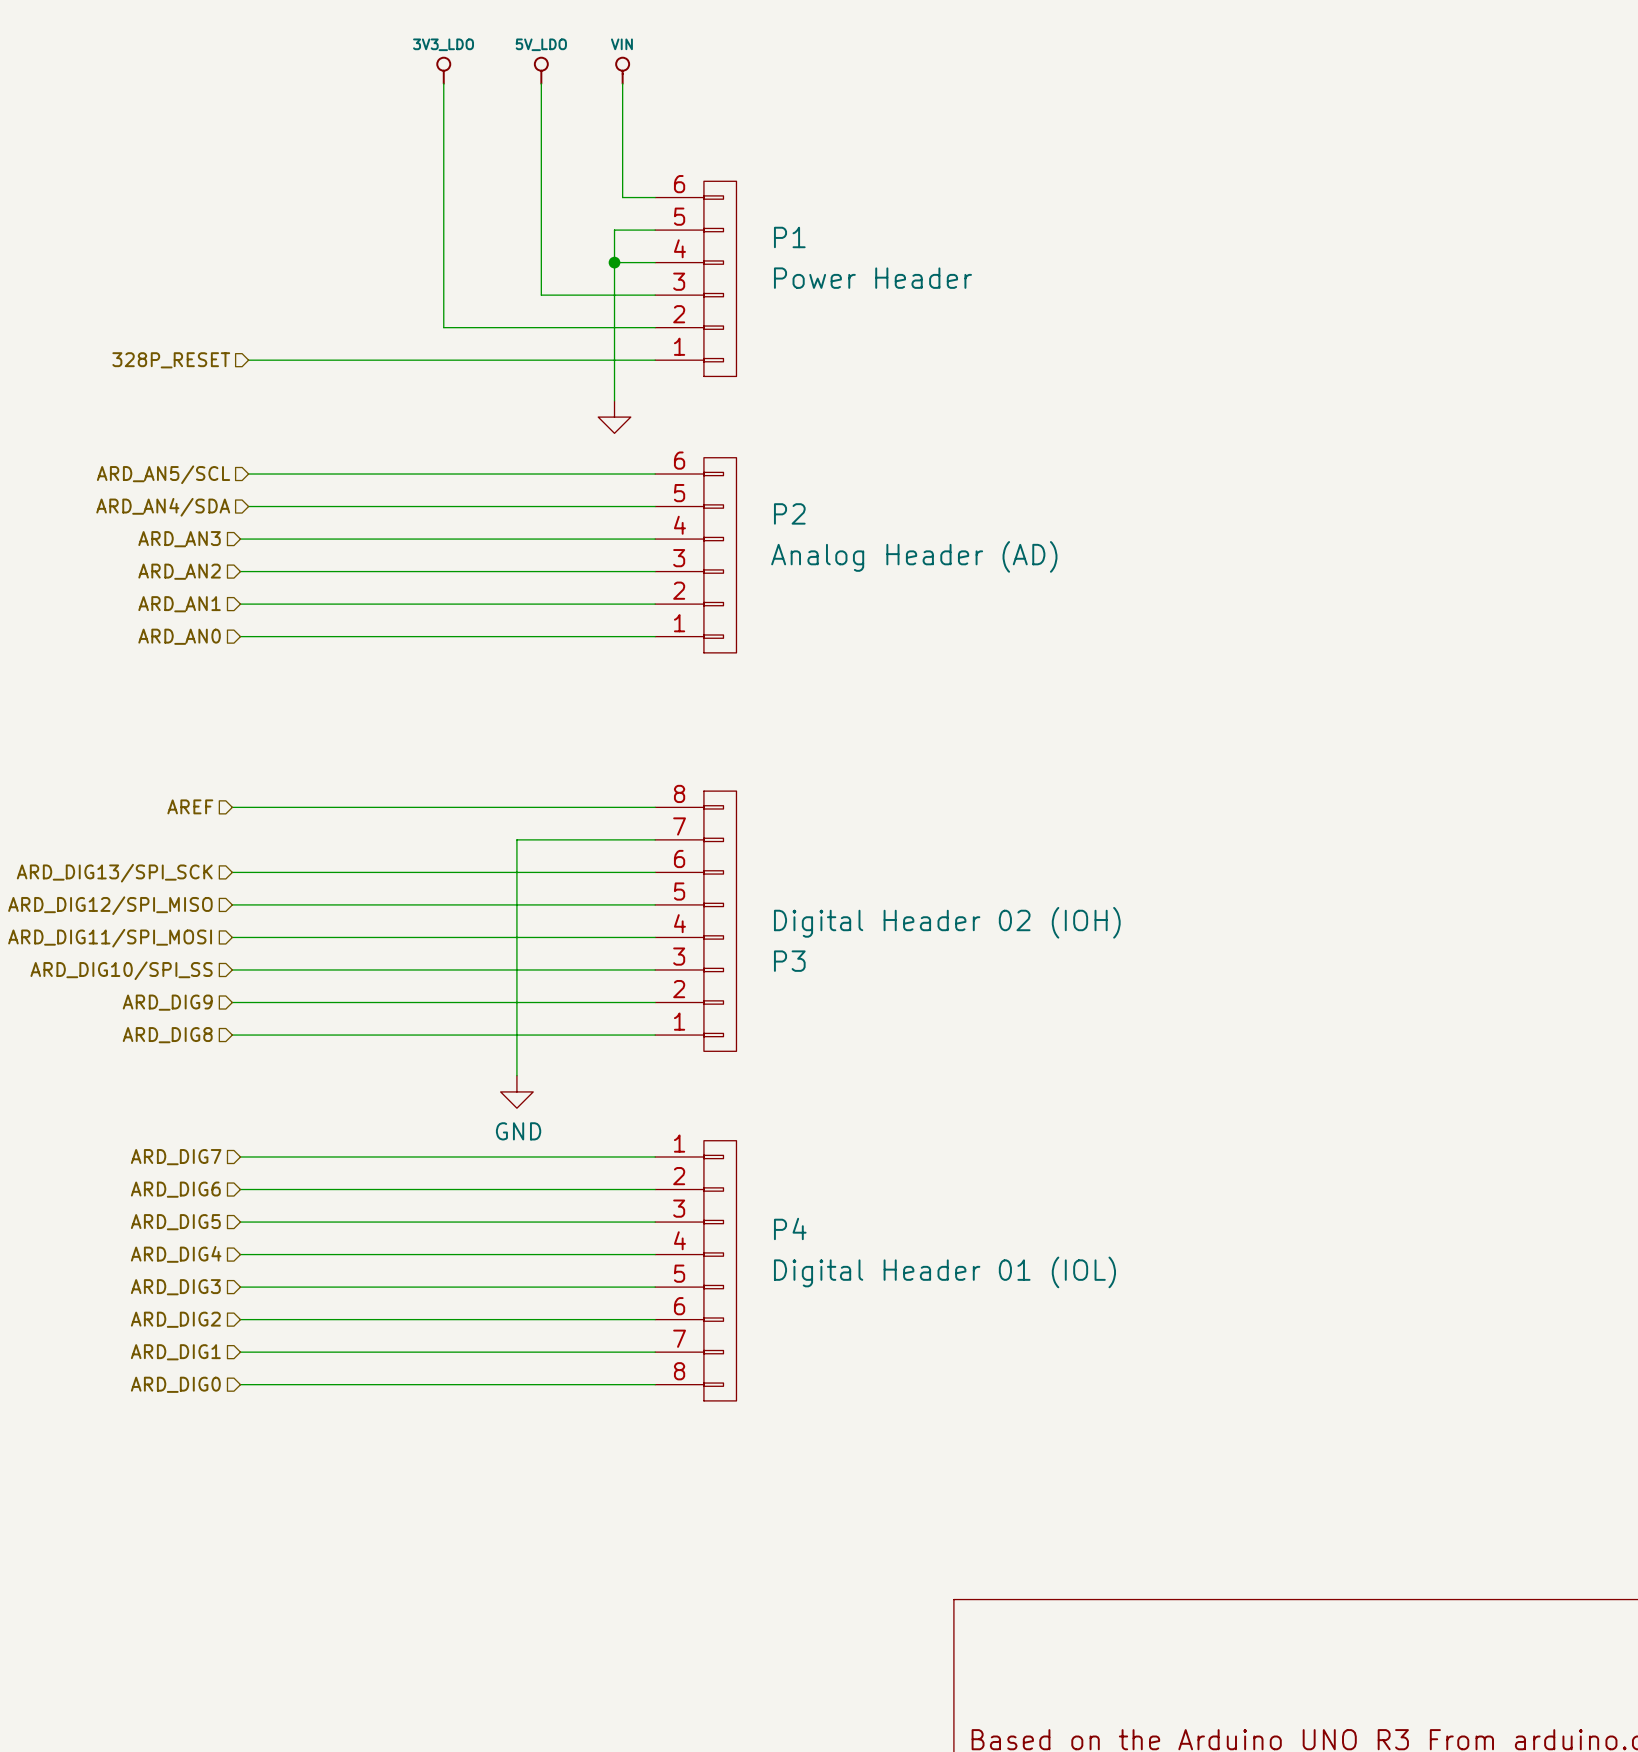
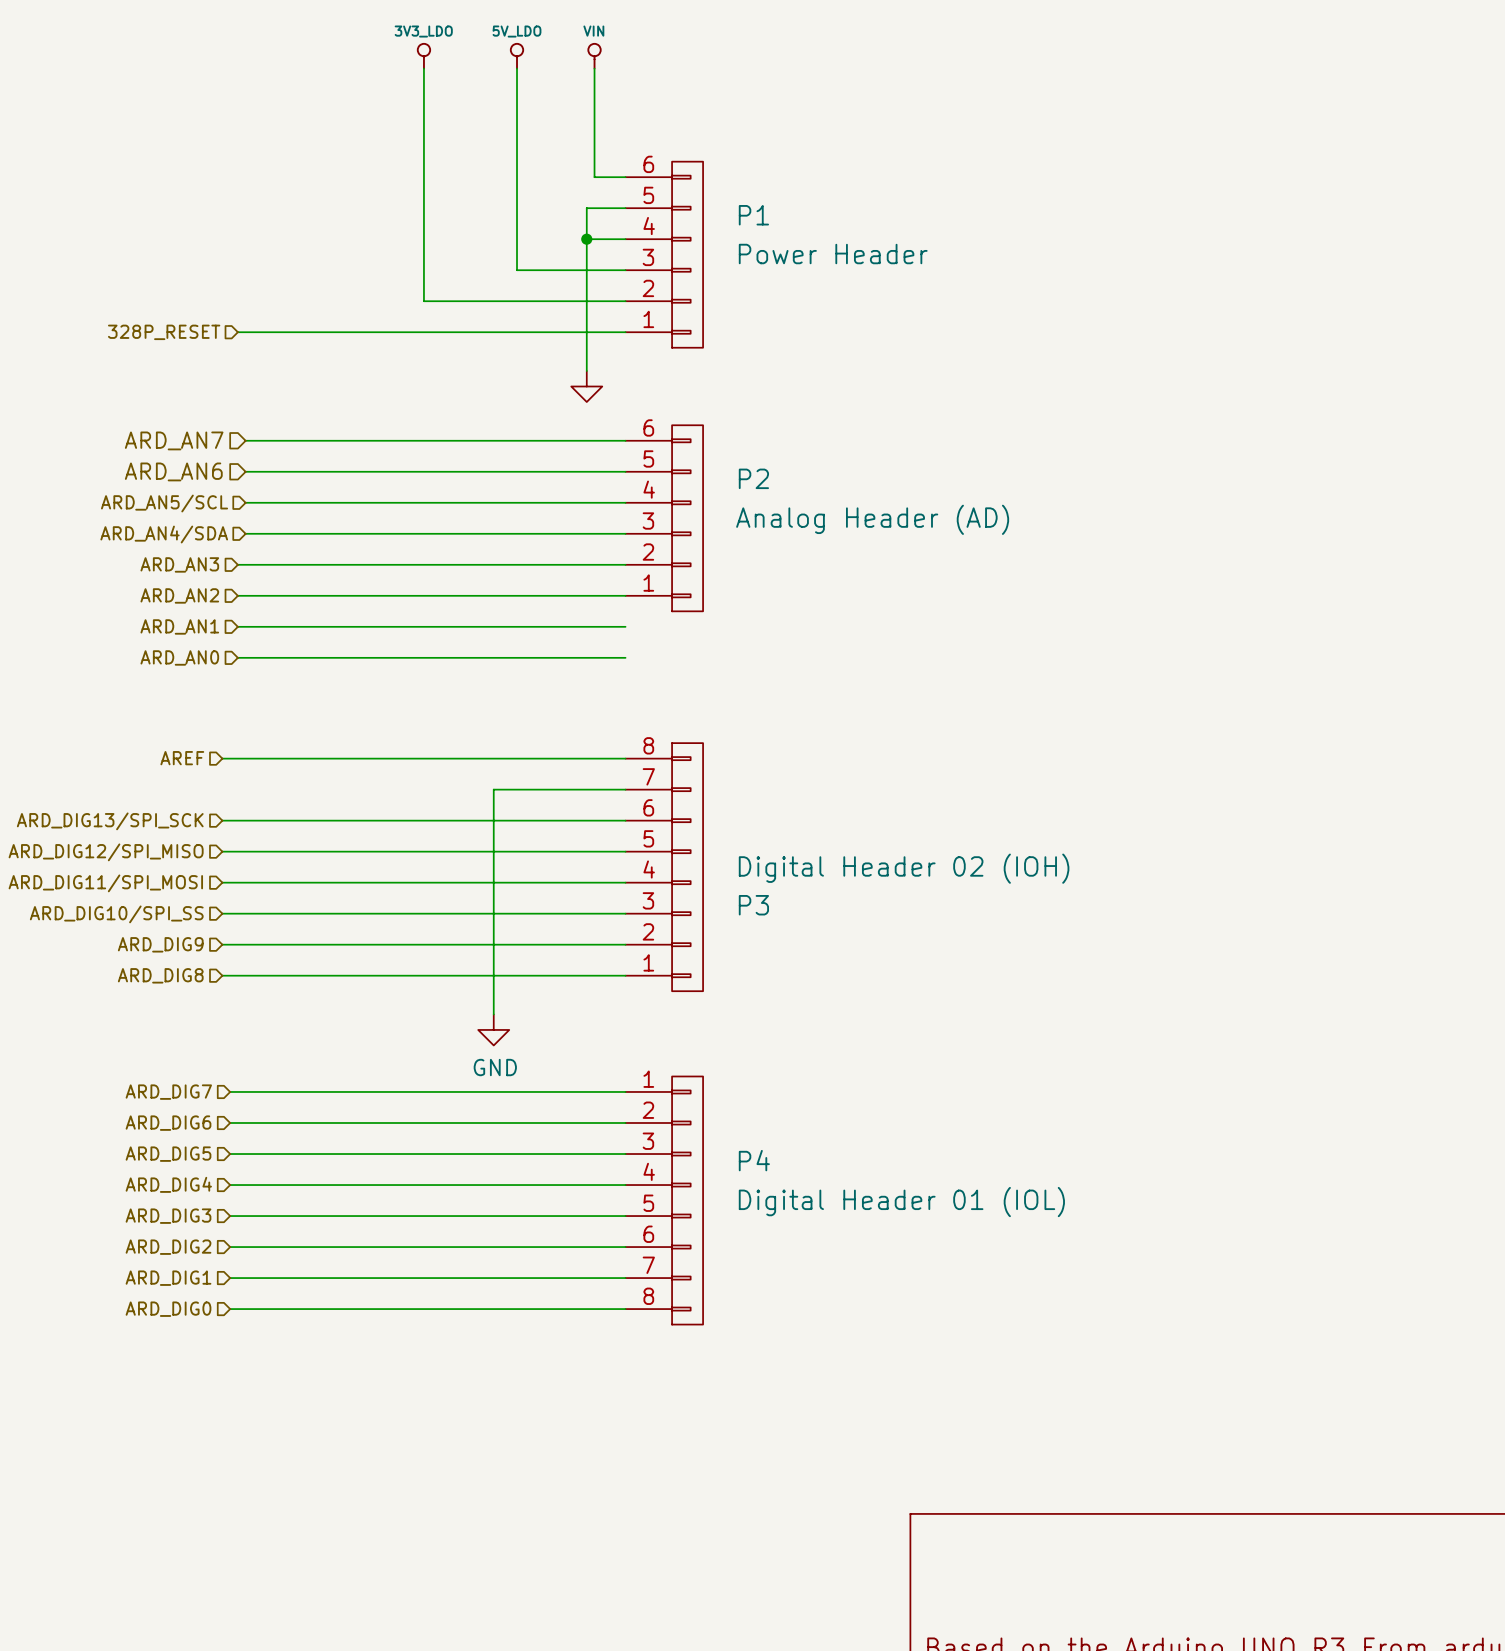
hierarchical label position: ARD_AN5/SCL (163, 474) -> ARD_AN5/SCL (164, 503)
hierarchical label: none -> ARD_AN7 (174, 440)
wire: (248, 474) (256, 474) -> none
hierarchical label: none -> ARD_AN6 (173, 471)
wire: (248, 506) (256, 506) -> none
hierarchical label position: ARD_AN4/SDA (163, 507) -> ARD_AN4/SDA (164, 534)
hierarchical label position: ARD_AN3 (179, 539) -> ARD_AN3 (179, 564)
wire: (240, 539) (256, 539) -> none
hierarchical label position: ARD_AN2 (179, 571) -> ARD_AN2 (179, 595)
wire: (240, 571) (256, 571) -> none
hierarchical label position: ARD_AN1 (179, 604) -> ARD_AN1 (179, 626)
wire: (240, 604) (248, 604) -> none
hierarchical label position: ARD_AN0 (179, 636) -> ARD_AN0 (179, 657)
wire: (240, 636) (248, 636) -> none
wire: none -> (237, 626) (625, 626)
wire: none -> (237, 657) (625, 657)

